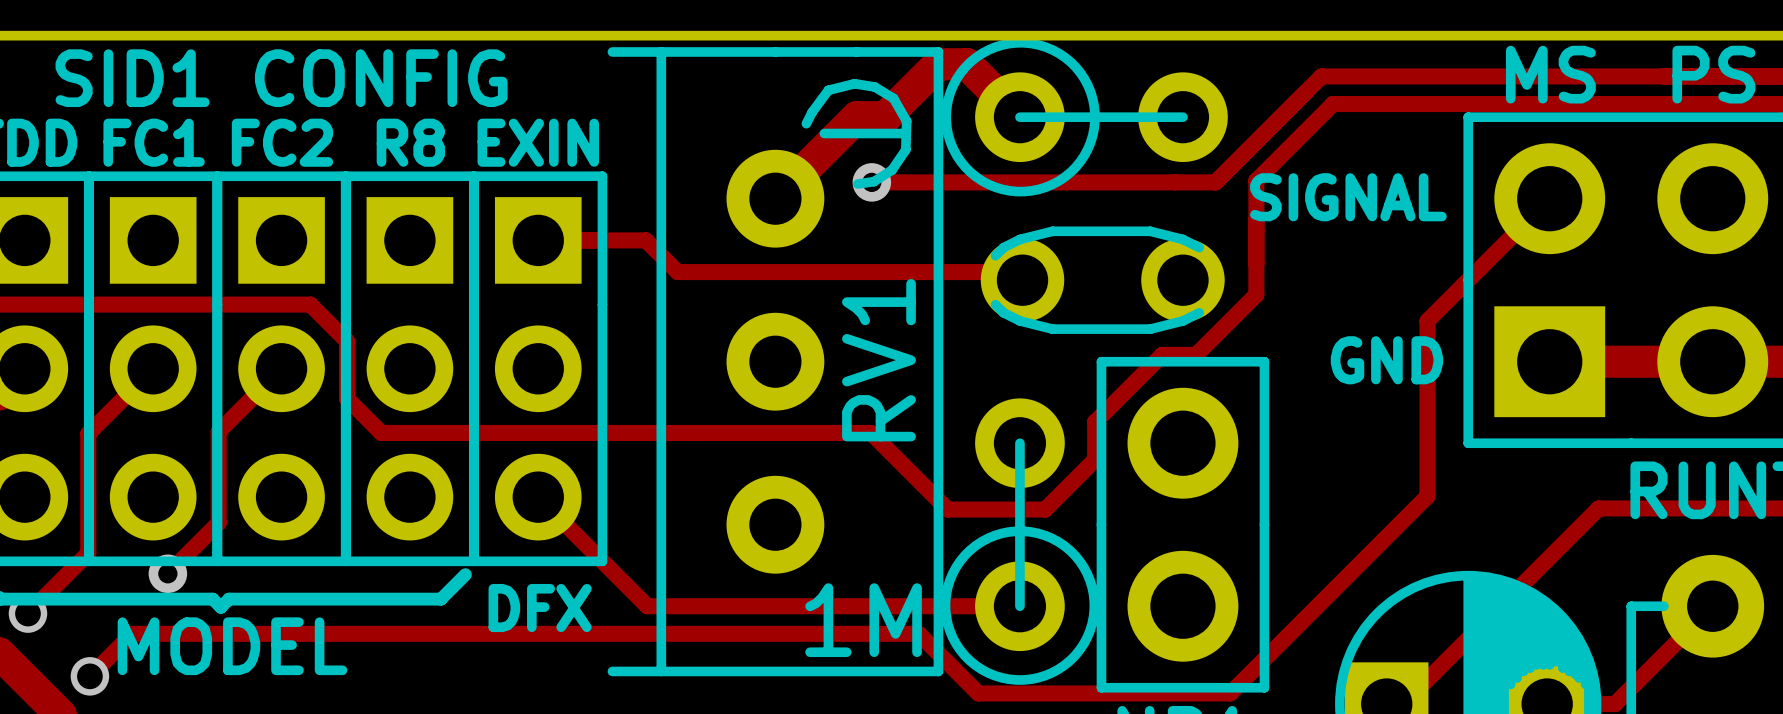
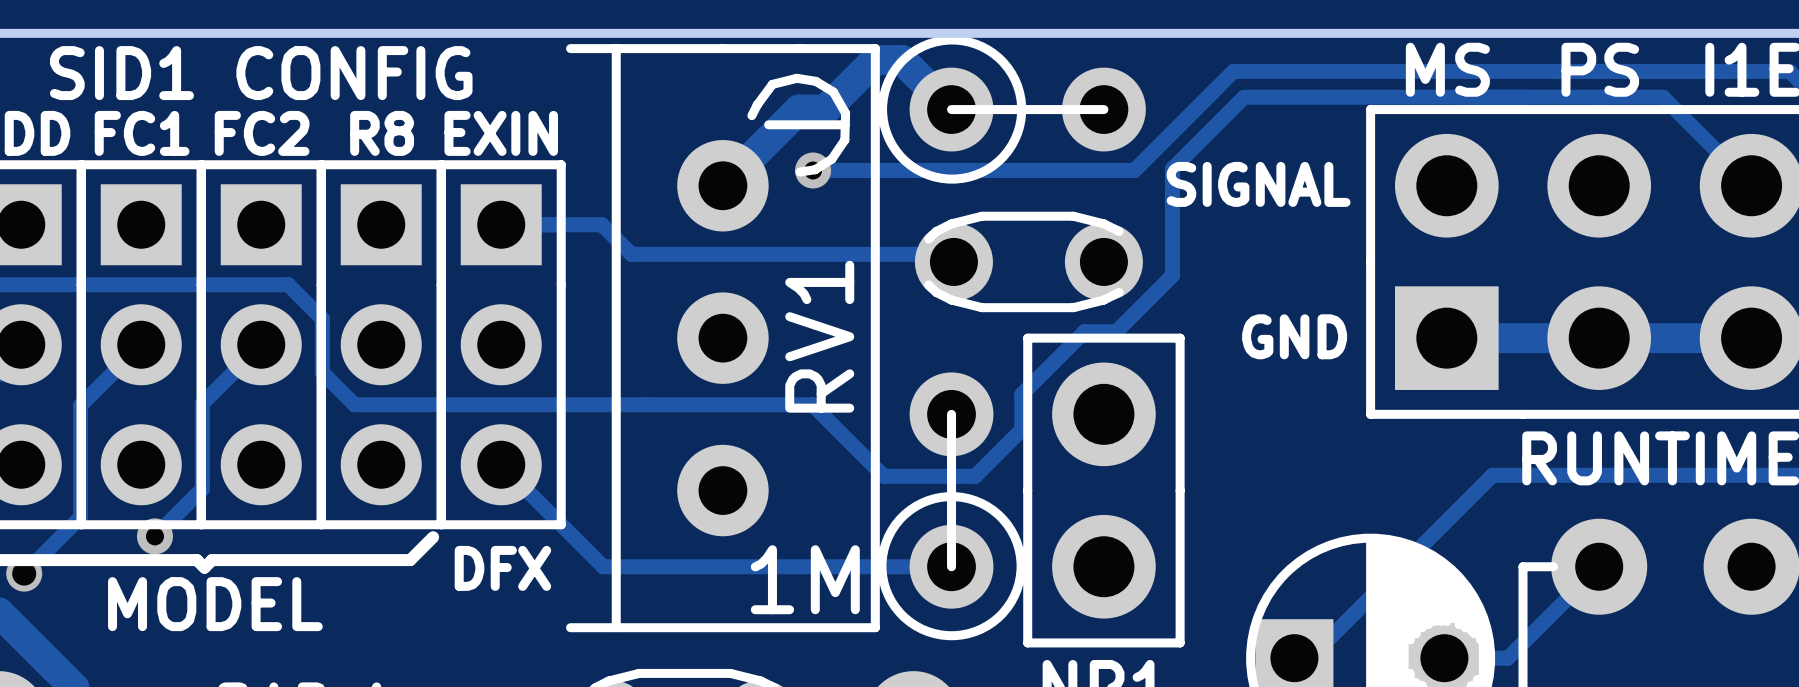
track: (1549, 198) (1427, 320) (1427, 496) (1230, 693) (978, 693) (918, 633) (132, 633) (89, 676) -> none
via: (89, 676) -> none

